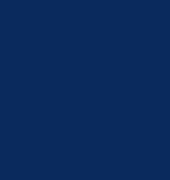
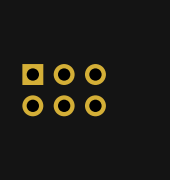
part: none -> (64, 90)

